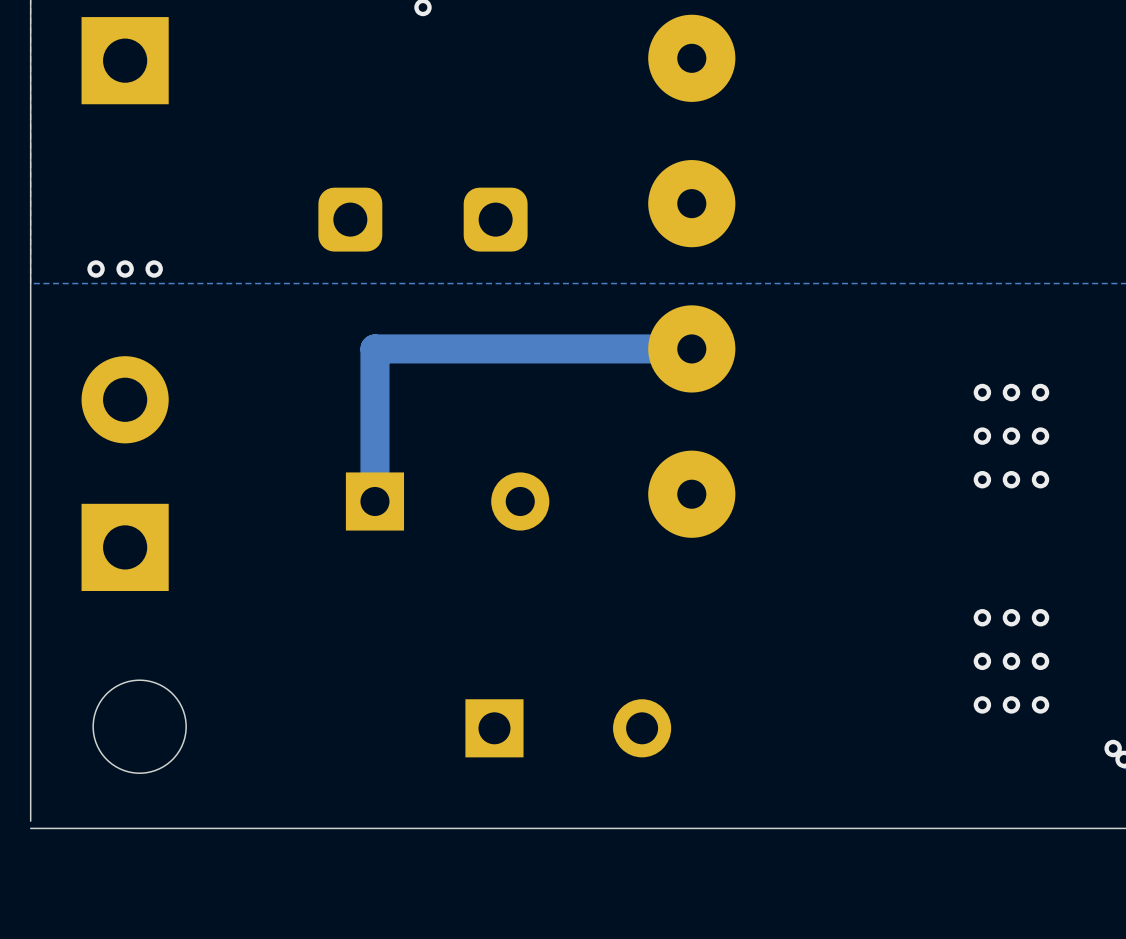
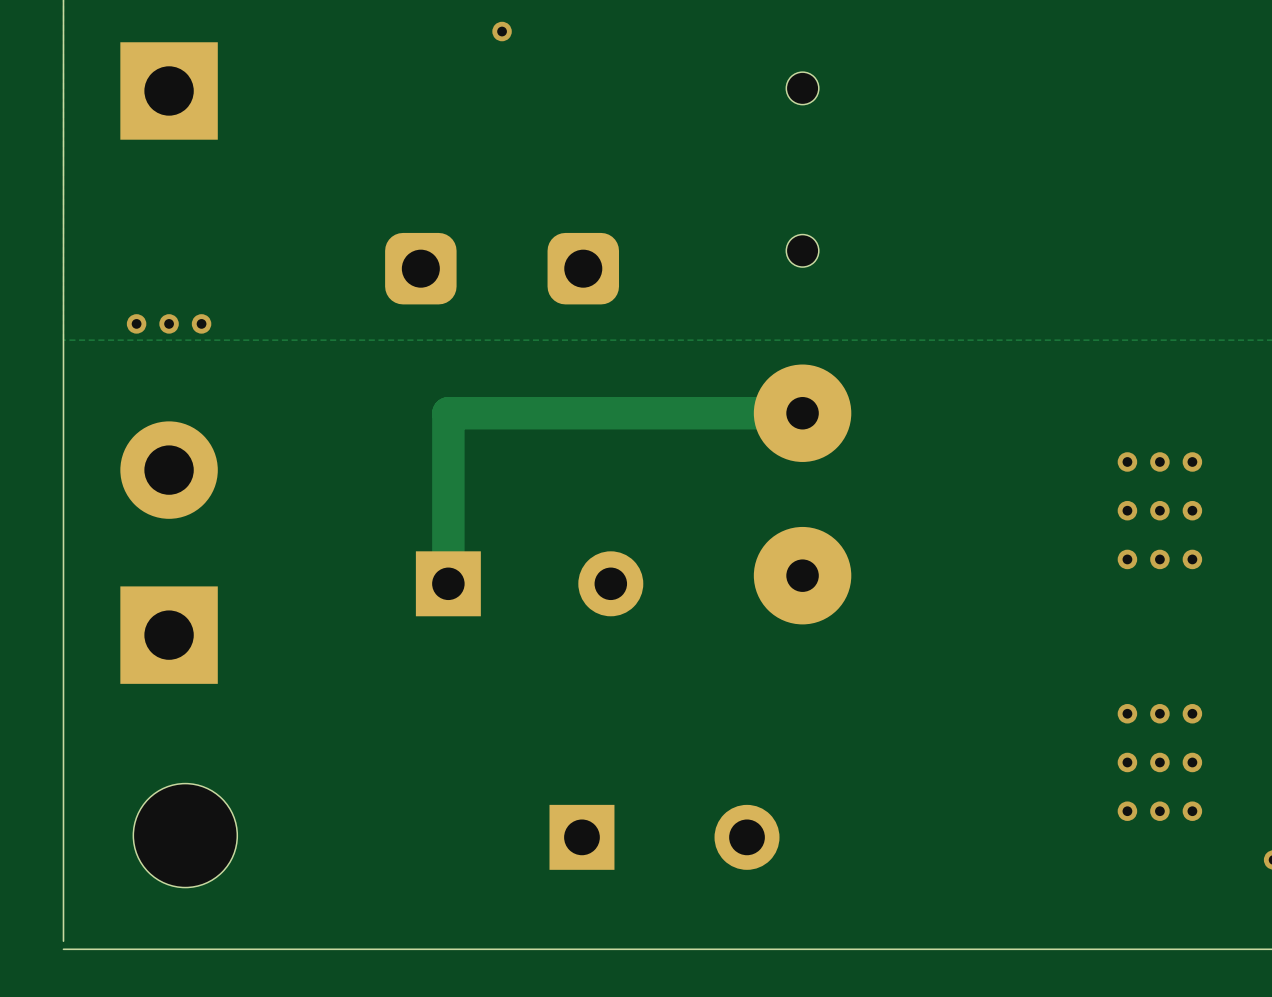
part footprint: [648, 14, 736, 102] -> [786, 72, 819, 105]
part footprint: [648, 160, 736, 248] -> [786, 234, 819, 268]

